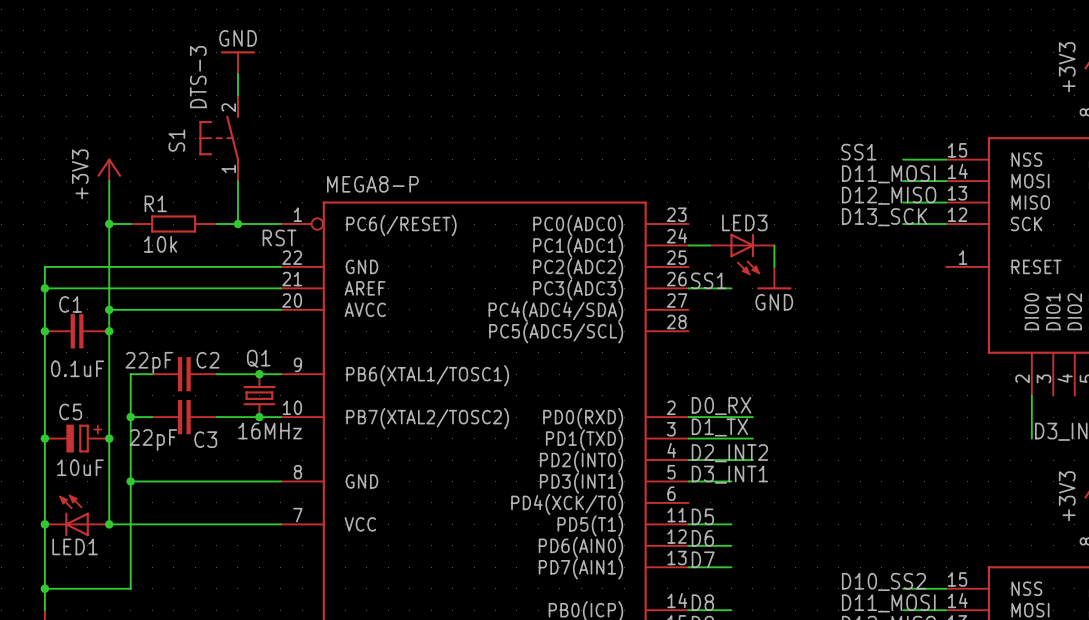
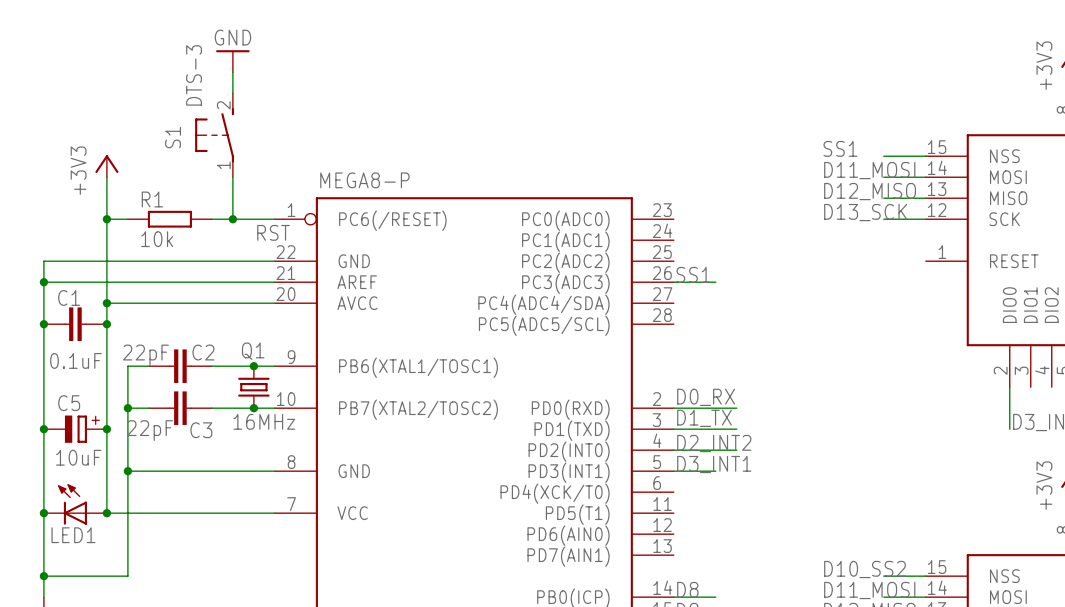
wire: (688, 245) (710, 245) -> none
wire: (774, 245) (774, 266) -> none
LED3: (742, 254) -> none
power symbol: GND (774, 278) -> none
label: D5 (702, 516) -> none
wire: (688, 524) (731, 524) -> none
label: D6 (702, 538) -> none
wire: (688, 545) (731, 545) -> none
label: D7 (703, 559) -> none
wire: (688, 567) (731, 567) -> none

